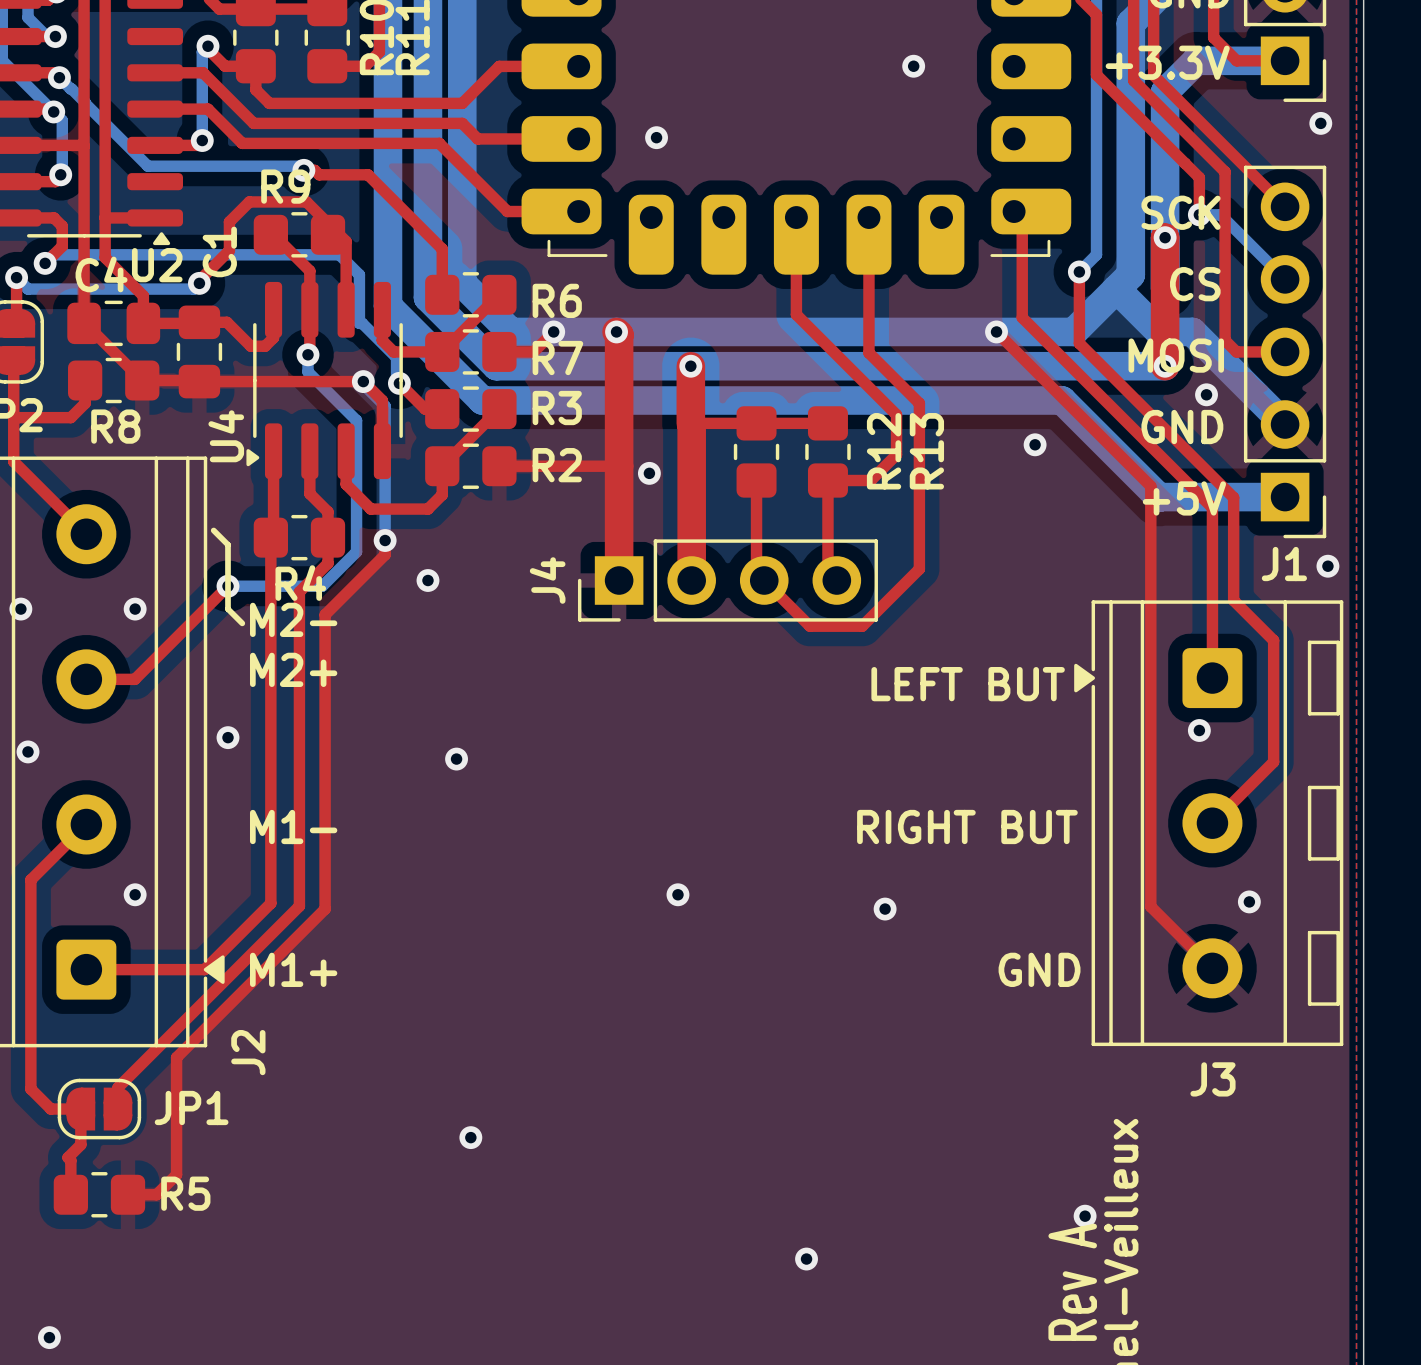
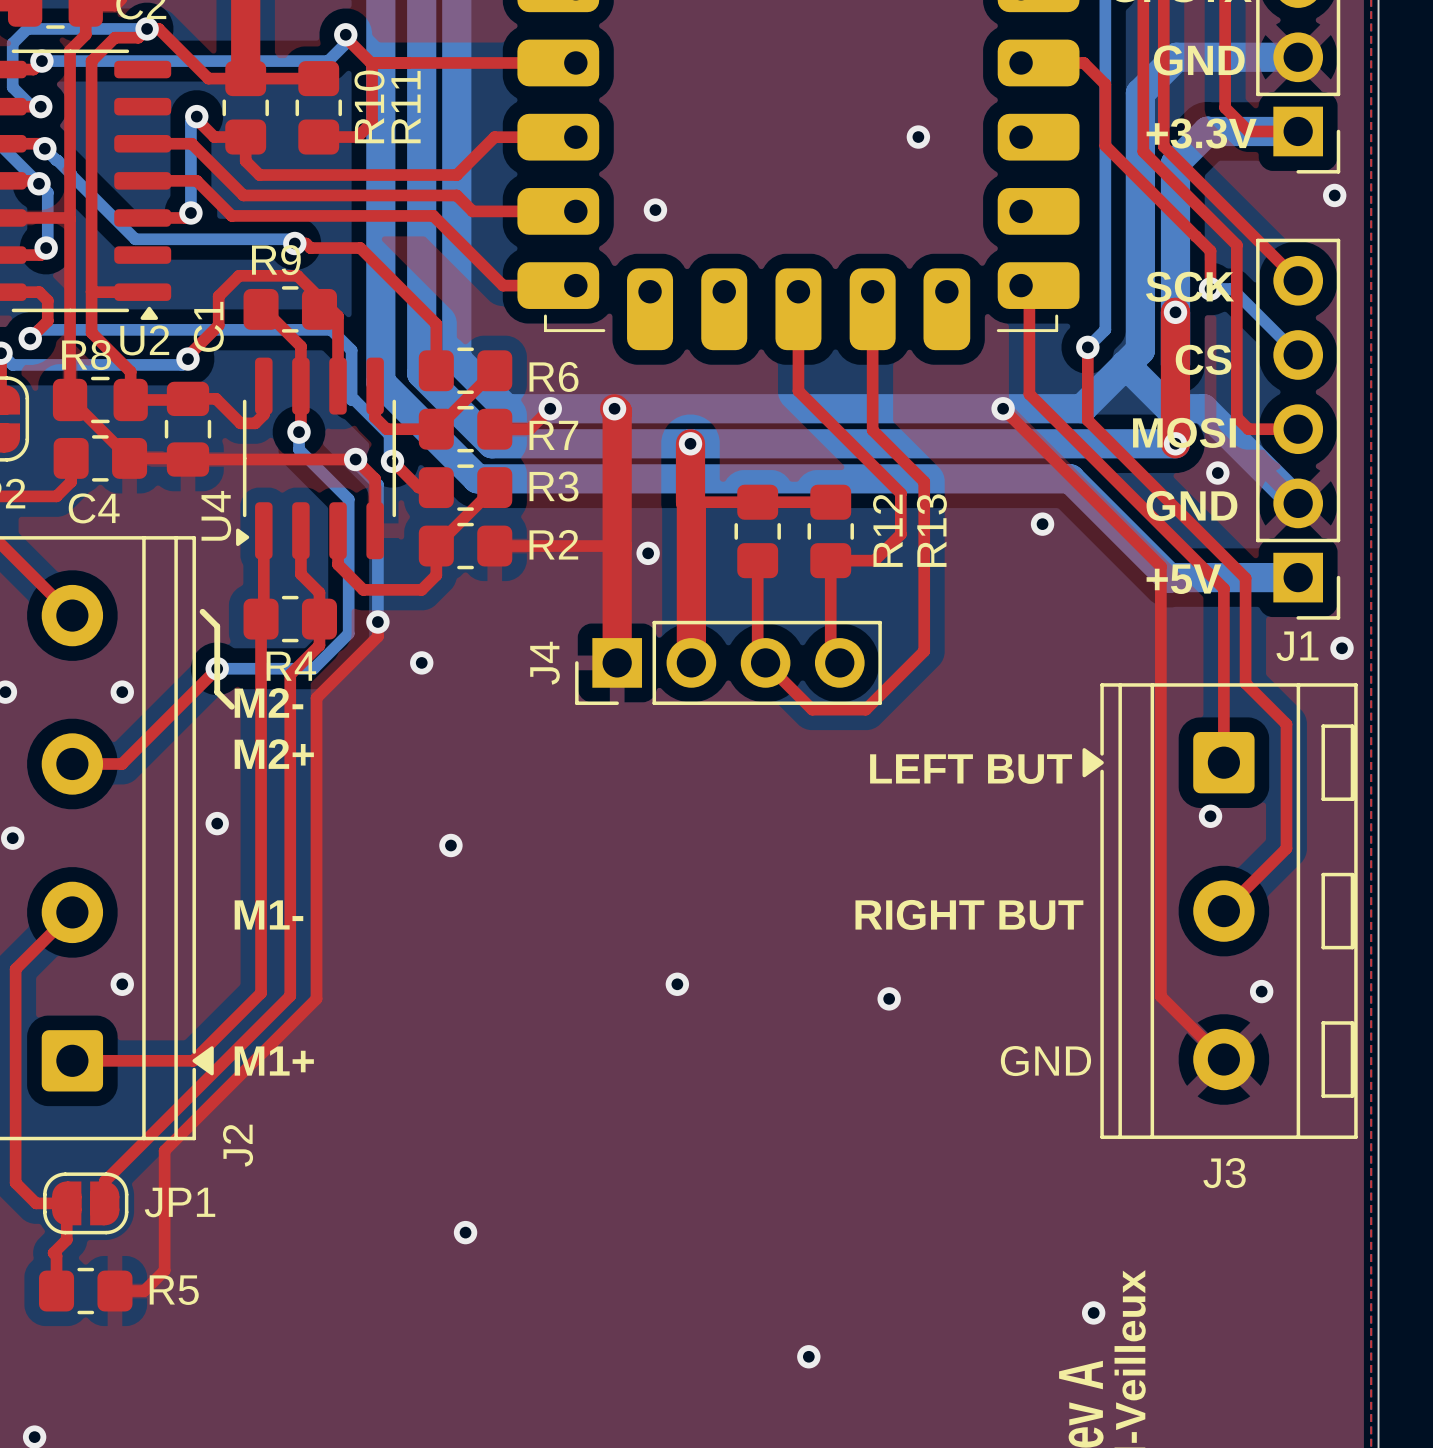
text position: +3.3V (1167, 62) -> +3.3V (1201, 133)
C4 name position: C4 (101, 274) -> C4 (94, 508)
R8 name position: R8 (115, 426) -> R8 (86, 355)

